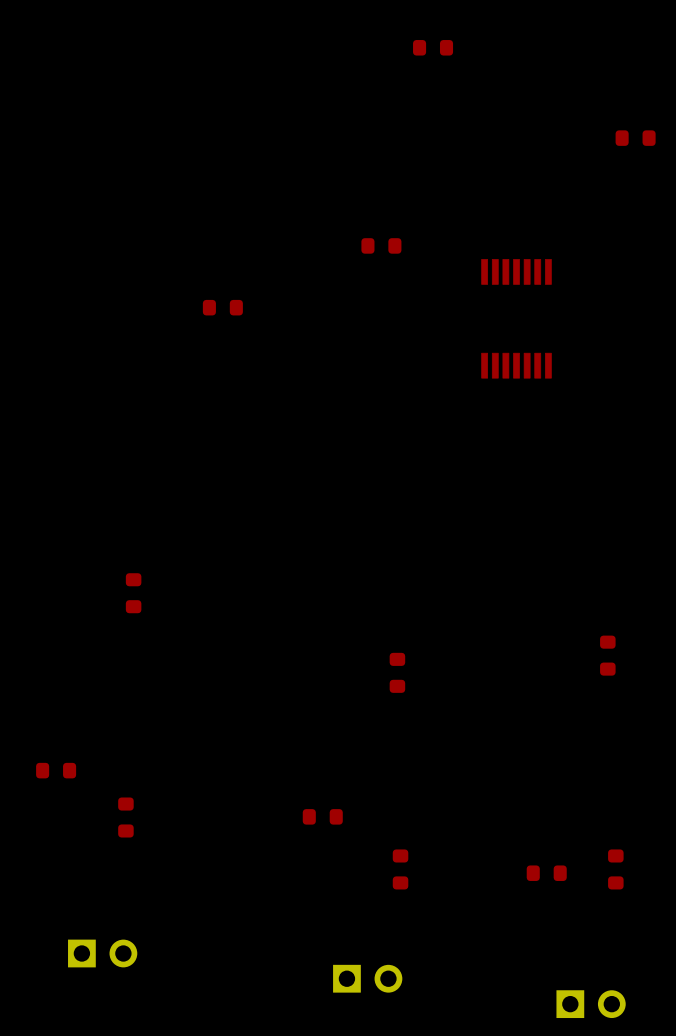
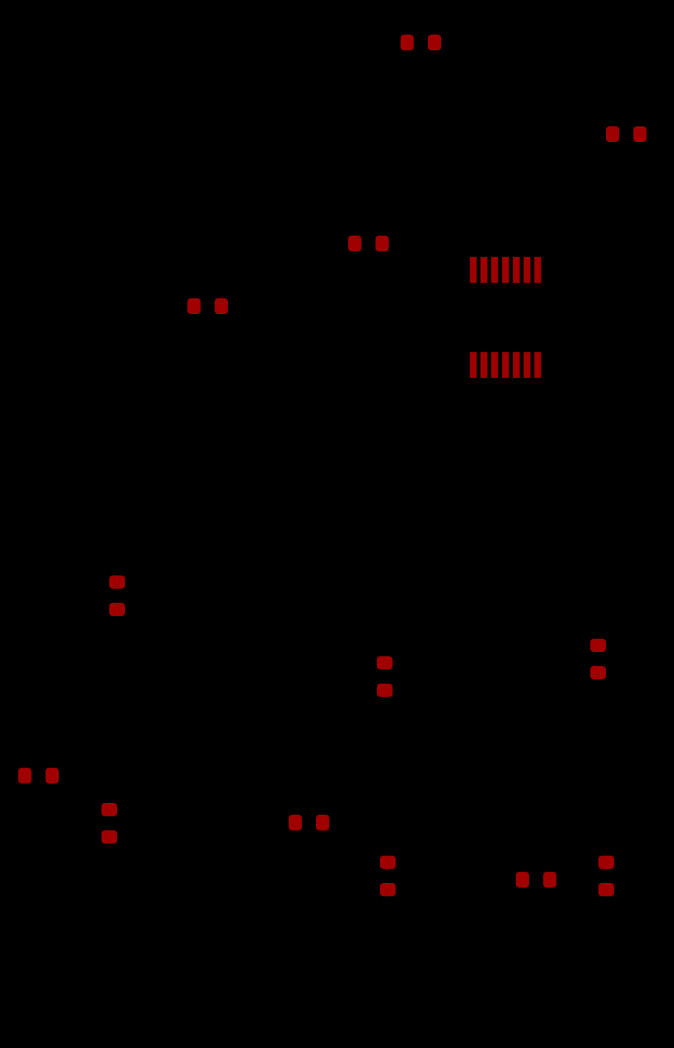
part: (102, 953) -> none
part: (367, 978) -> none
part: (591, 1004) -> none

